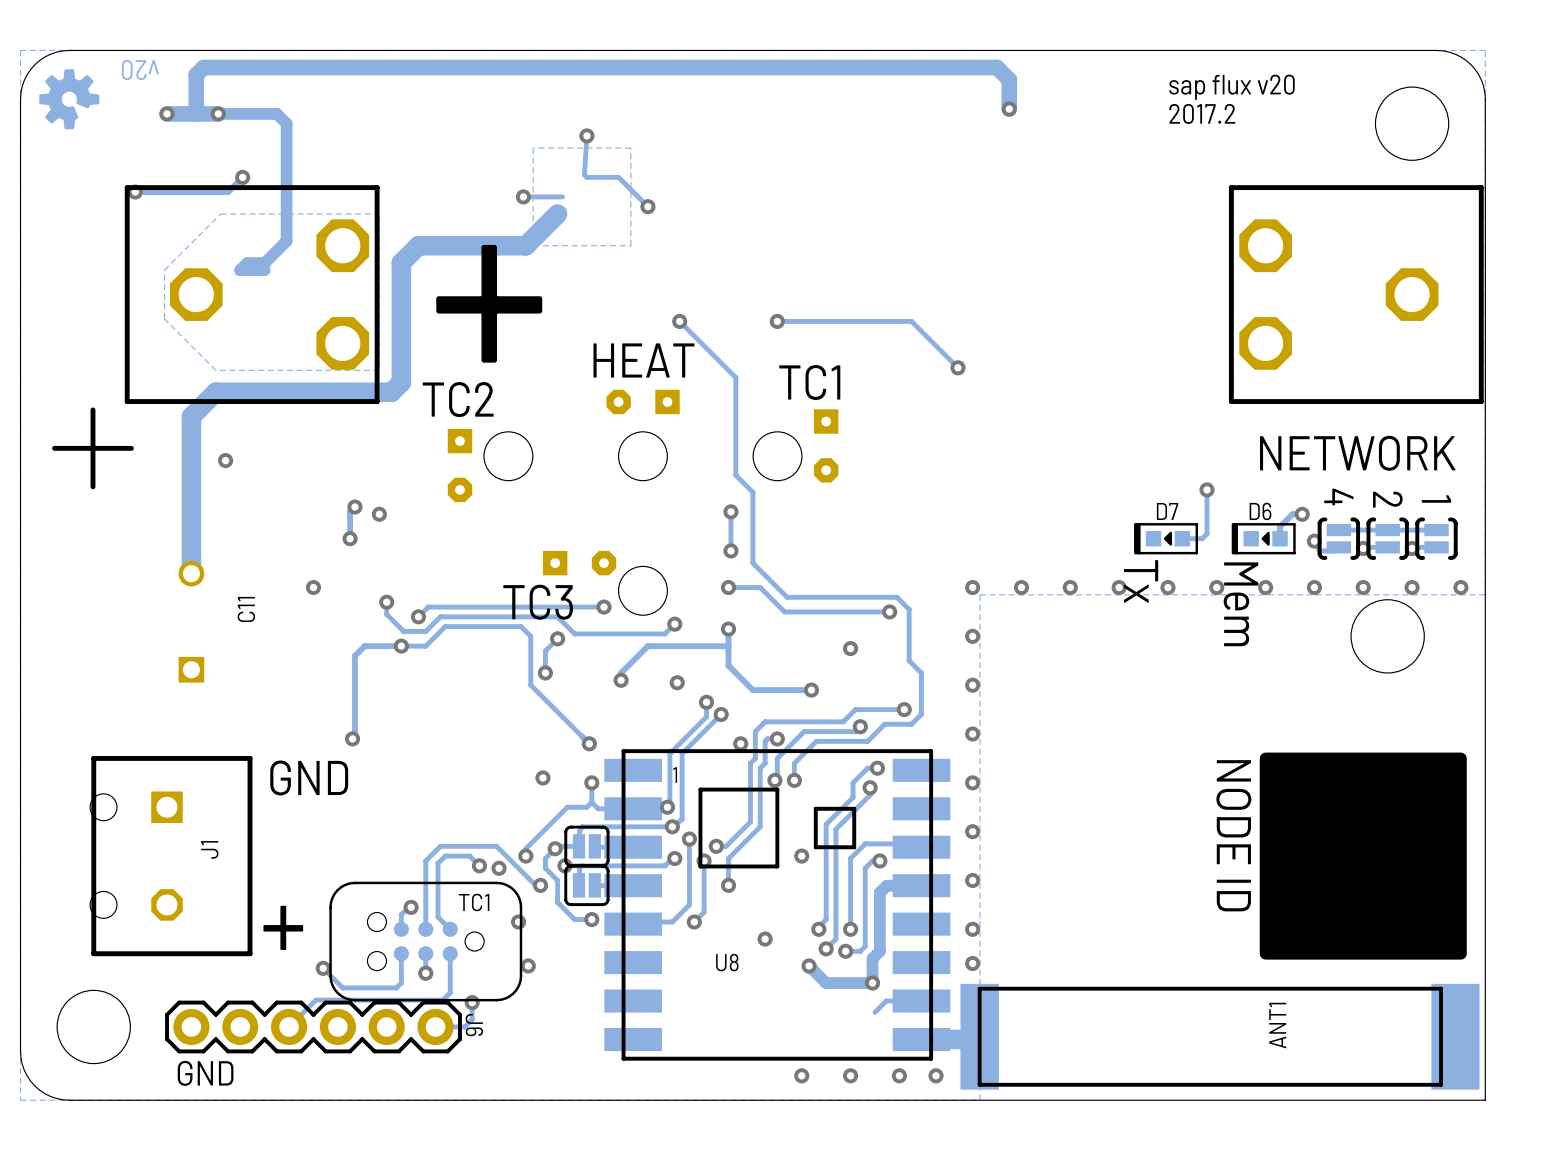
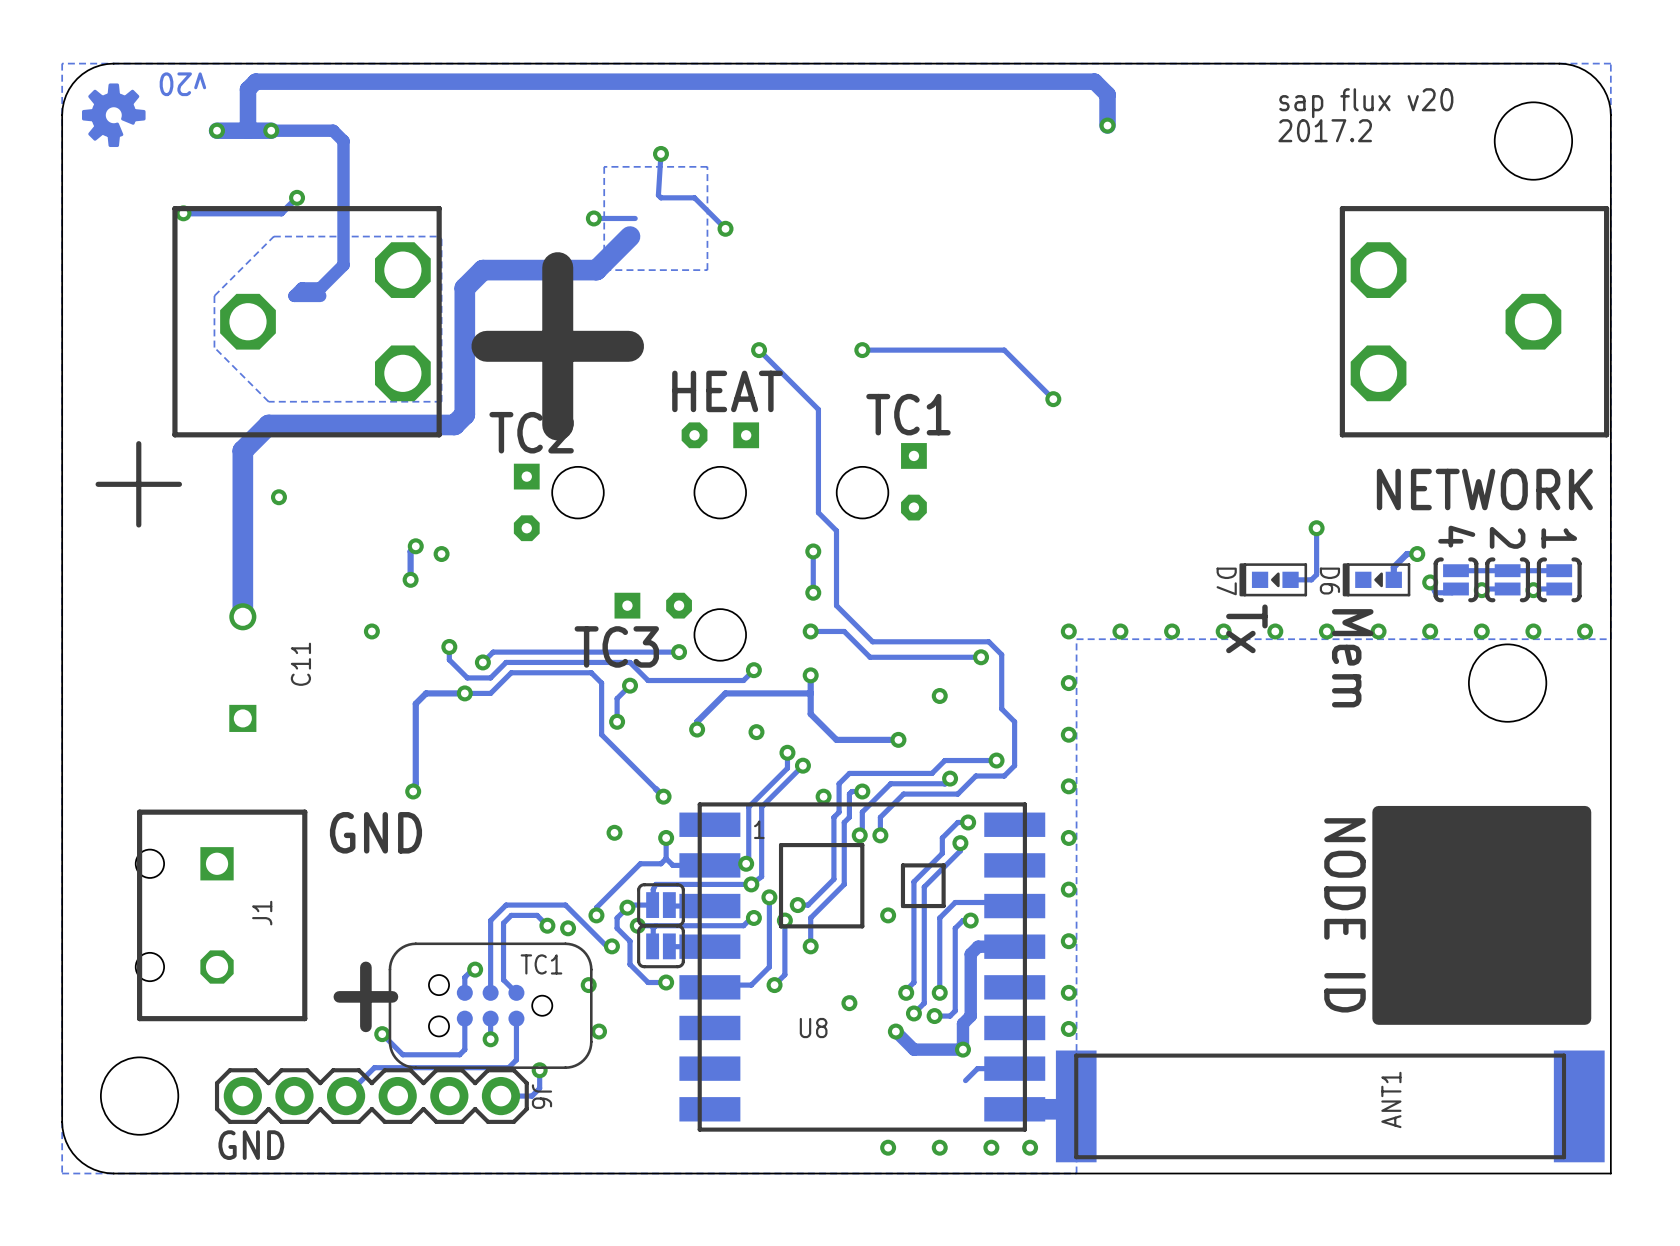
D7 name rotation: 0° (1167, 511) -> 90° clockwise (1226, 581)
D7 name position: D7 (1167, 511) -> D7 (1226, 581)
D6 name rotation: 0° (1260, 511) -> 90° clockwise (1329, 581)
D6 name position: D6 (1260, 511) -> D6 (1329, 581)

